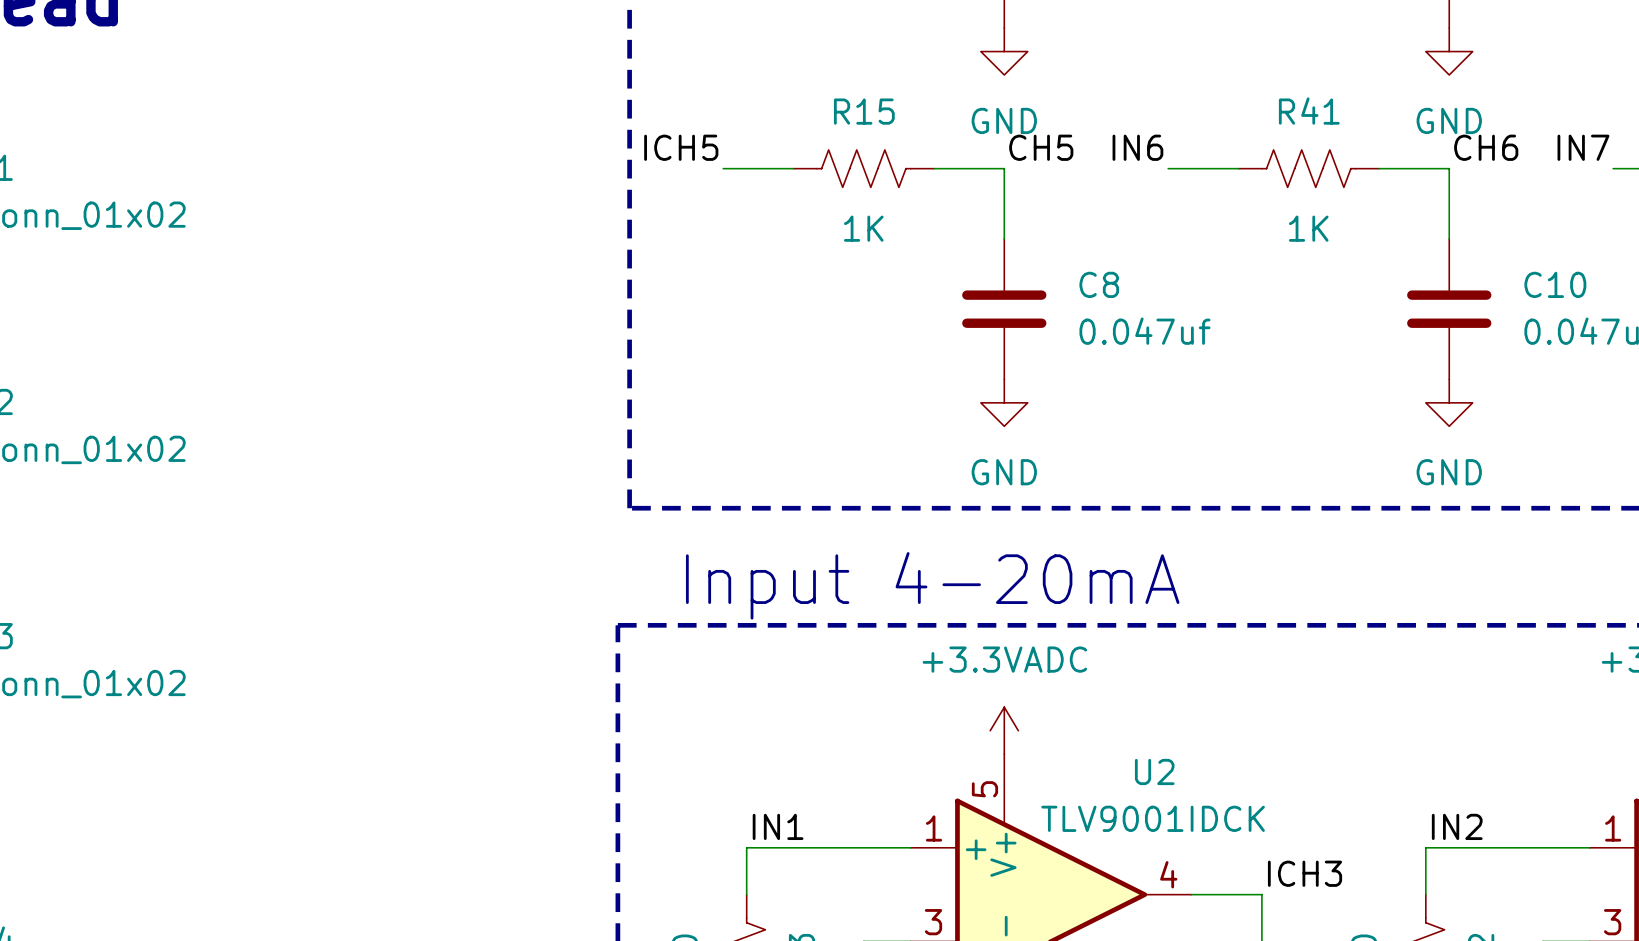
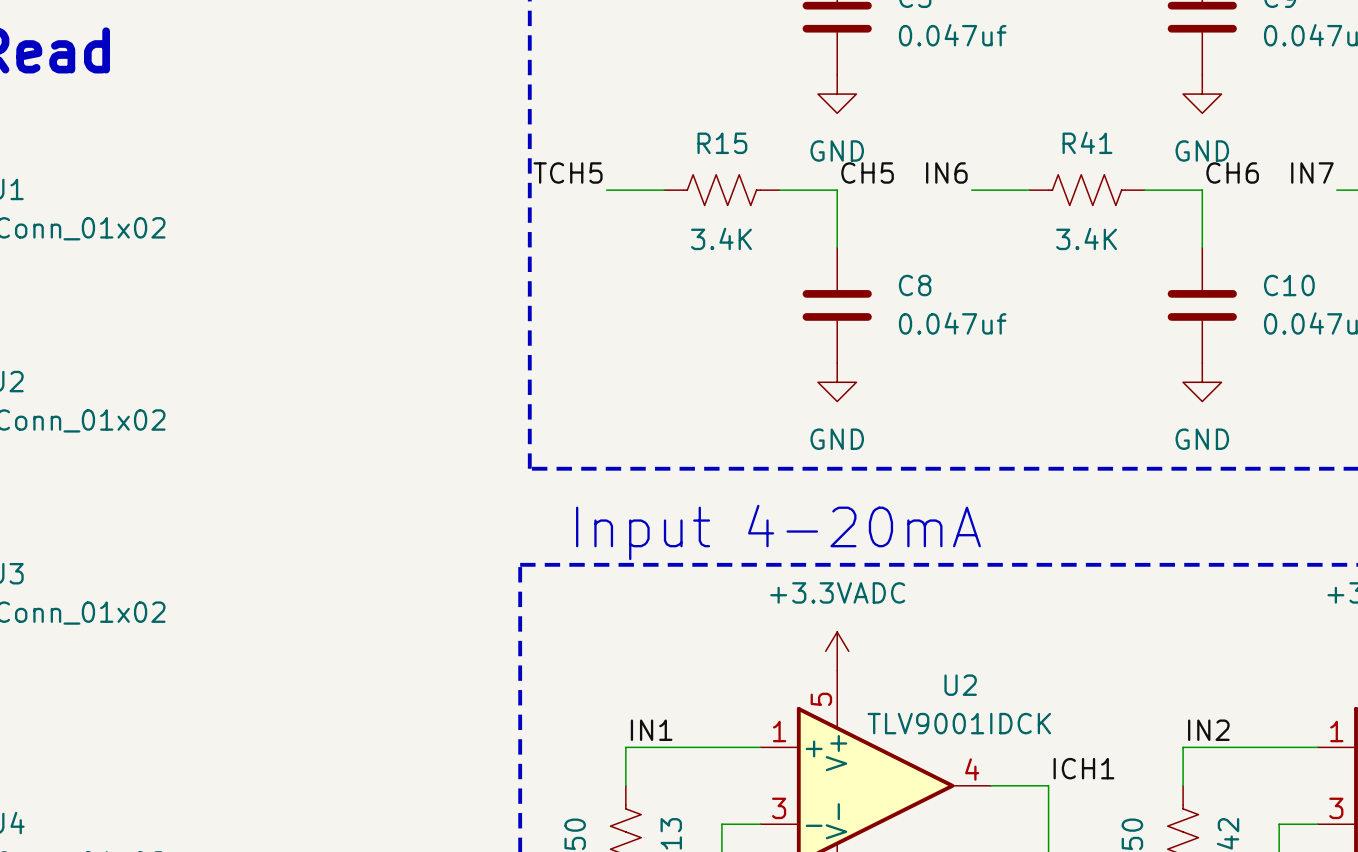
label: ICH5 (681, 147) -> TCH5 (568, 172)
R15 value: 1K (863, 228) -> 3.4K (721, 238)
R41 value: 1K (1308, 228) -> 3.4K (1086, 238)
label: ICH3 (1305, 873) -> ICH1 (1083, 768)

